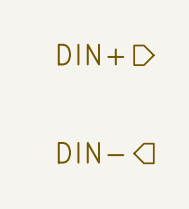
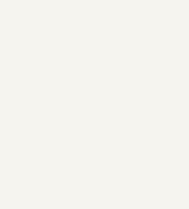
hierarchical label: DIN+ (91, 54) -> none
hierarchical label: DIN- (91, 152) -> none

